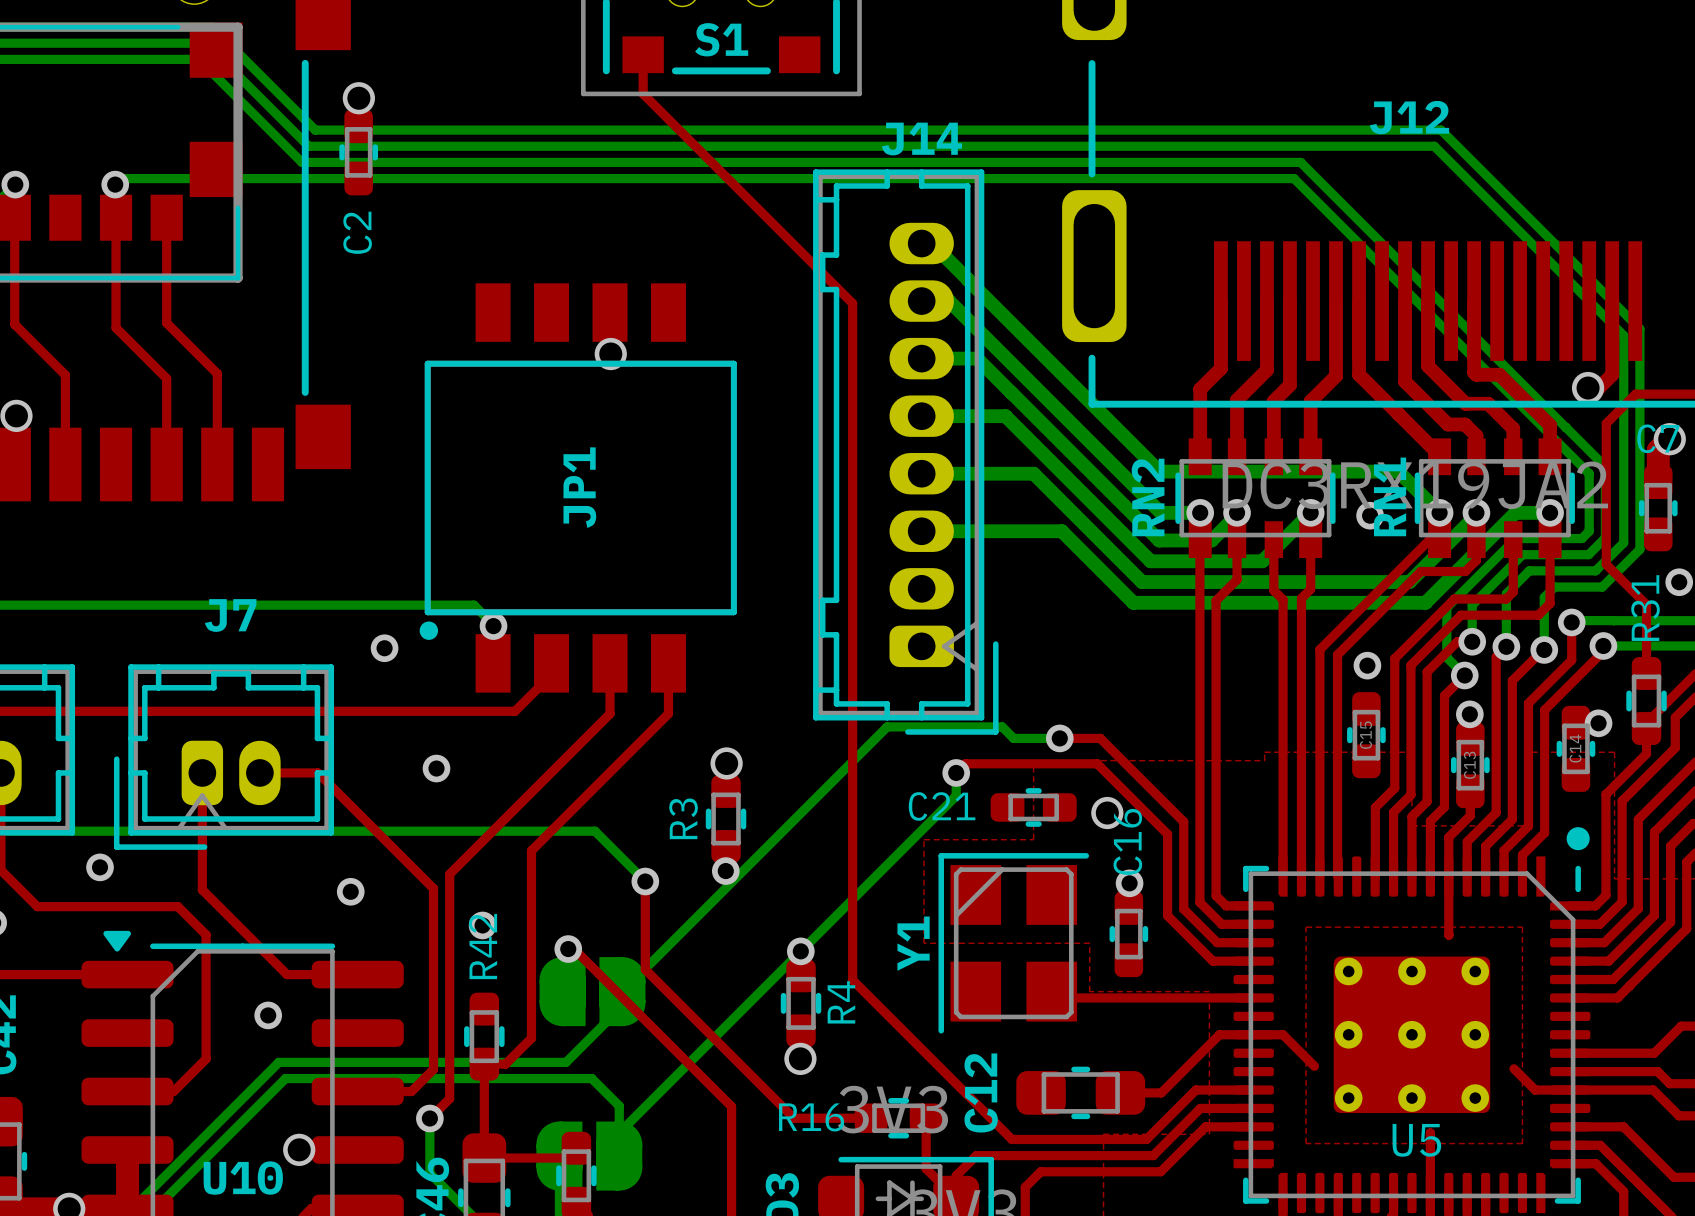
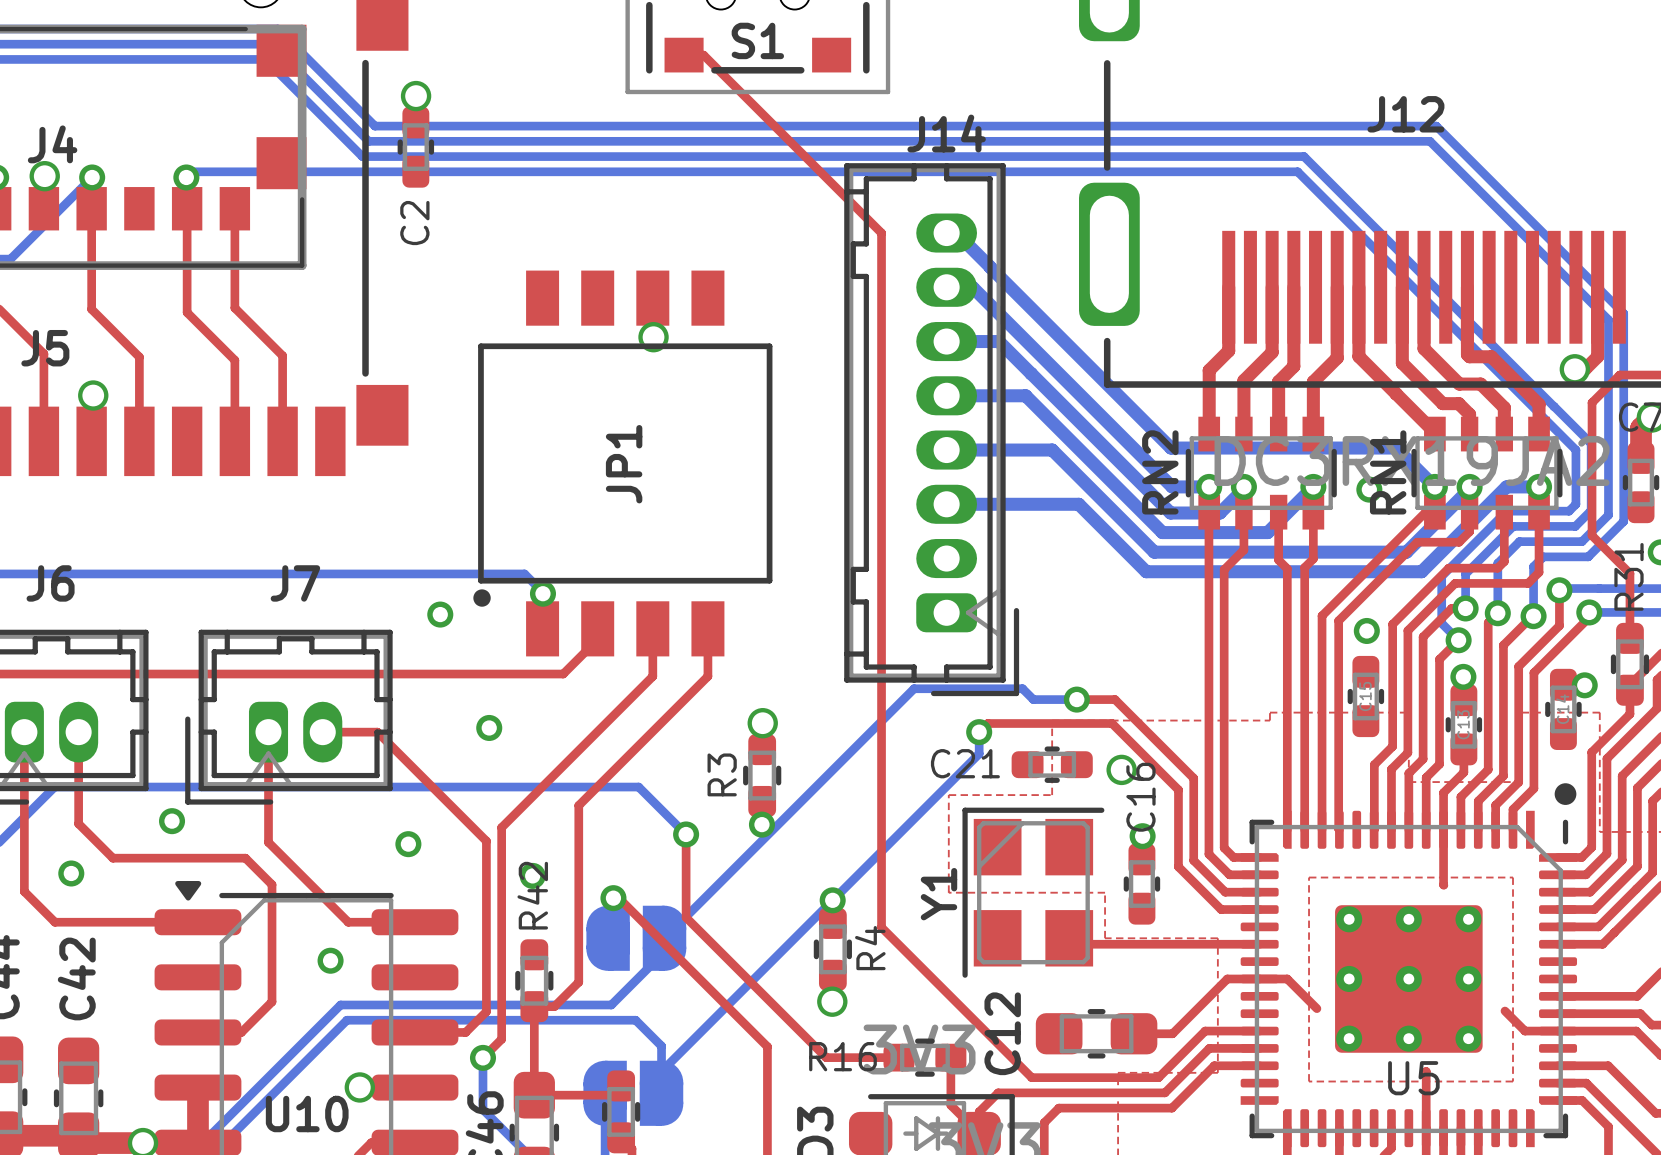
top track: (643, 54) (643, 93) (852, 303) -> (684, 55) (703, 55) (881, 233) (881, 289)

